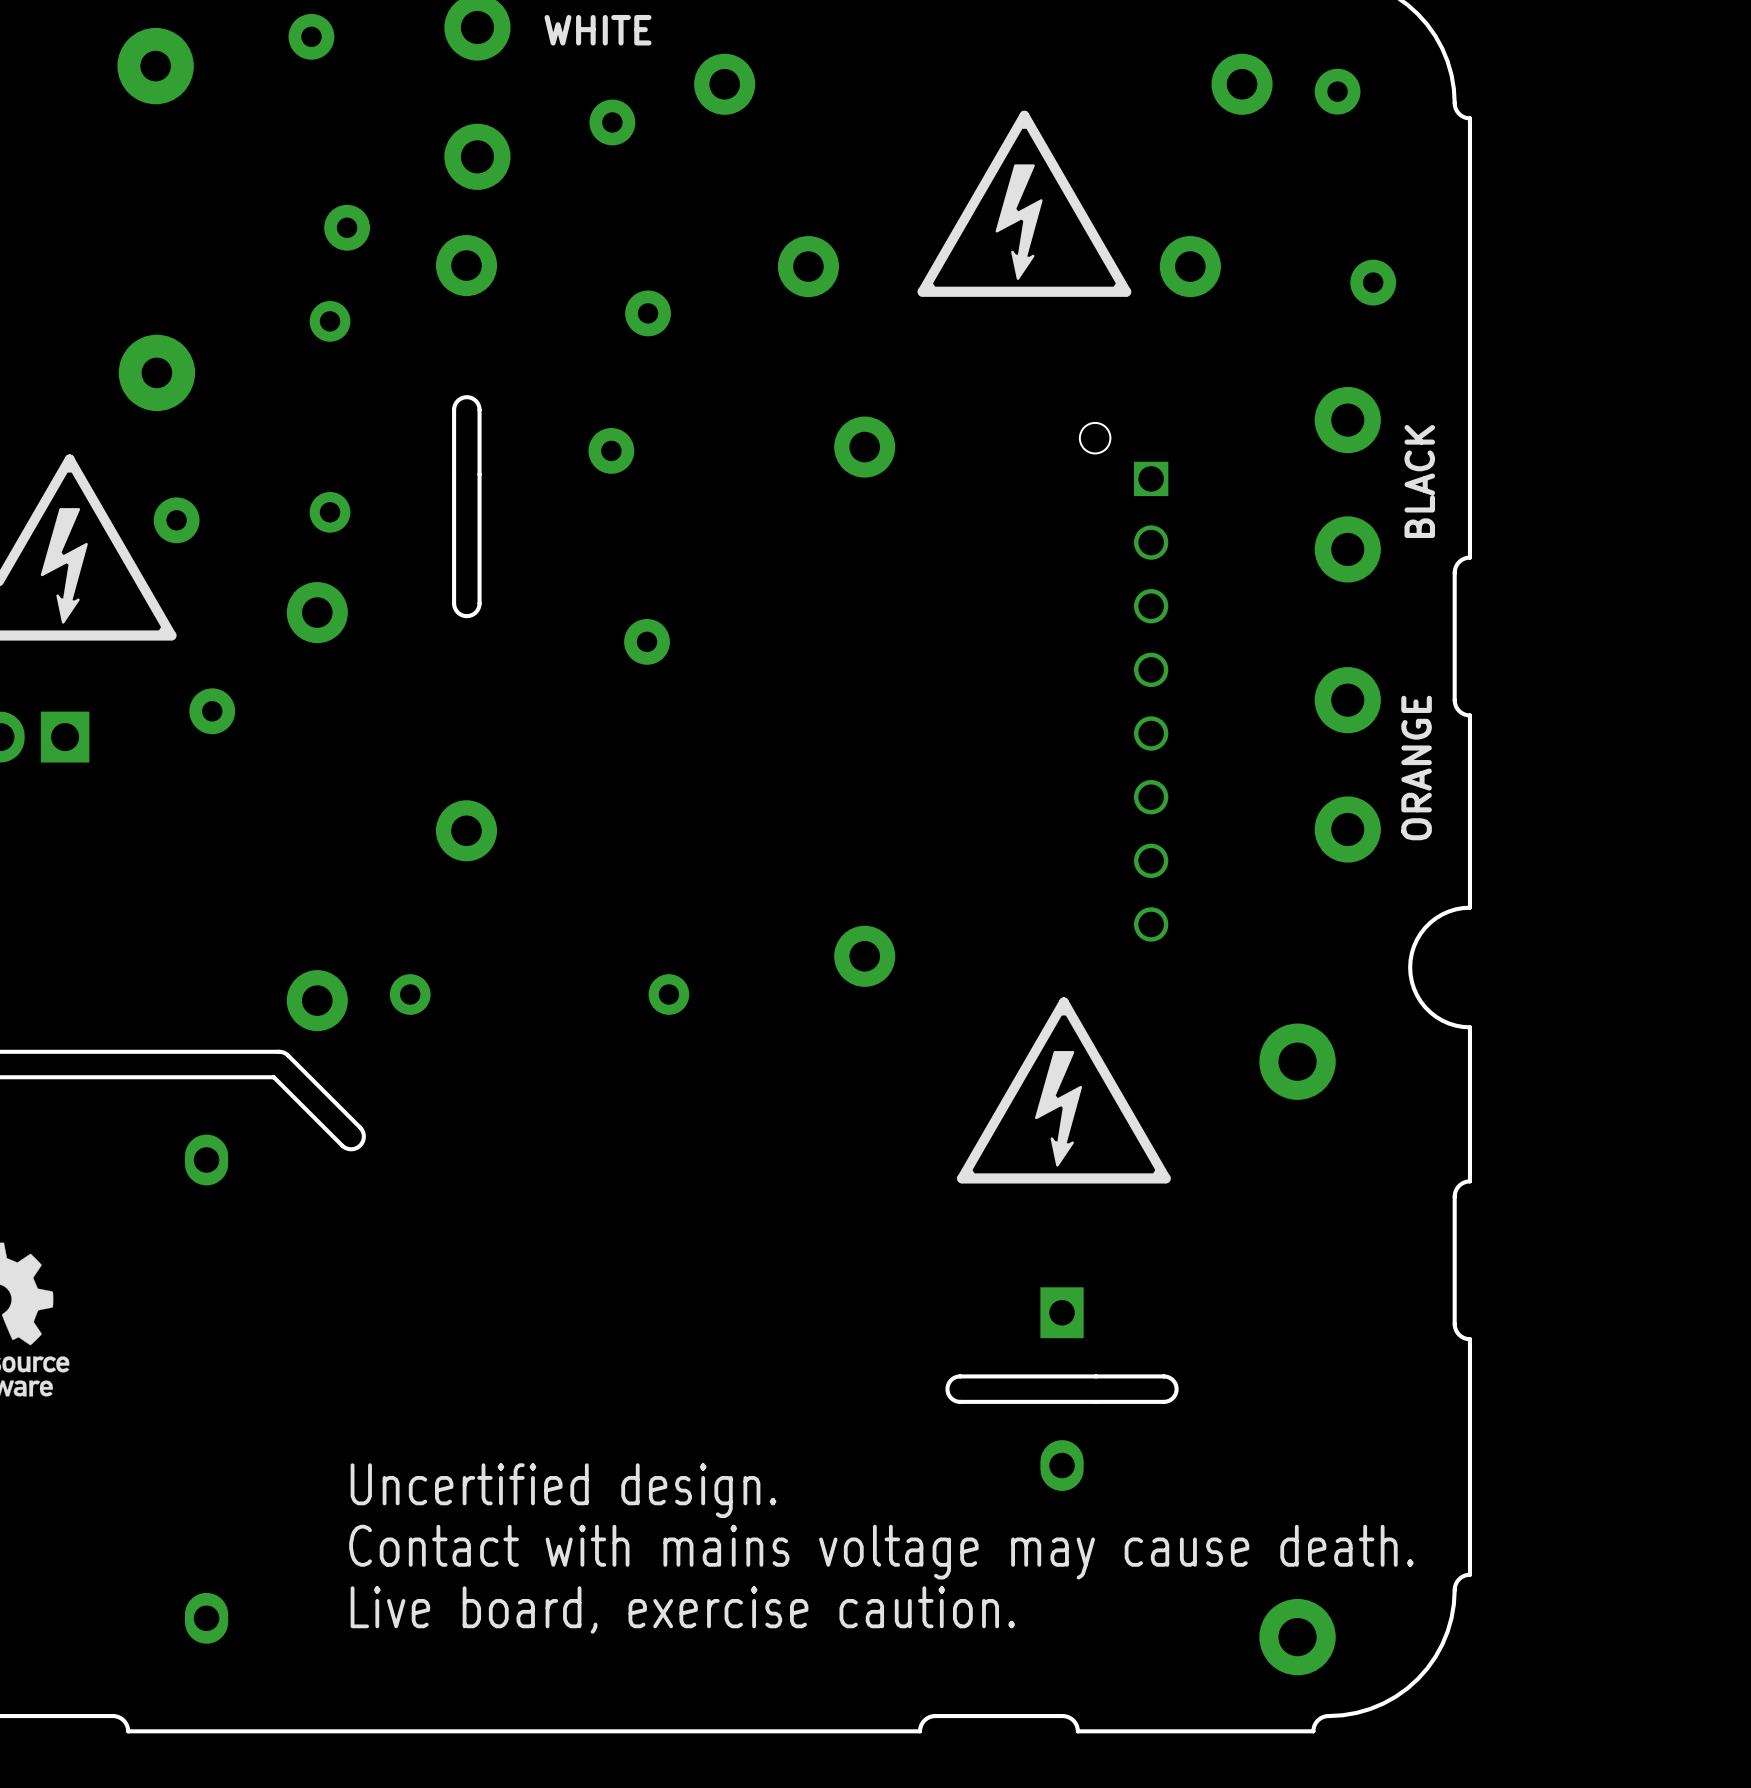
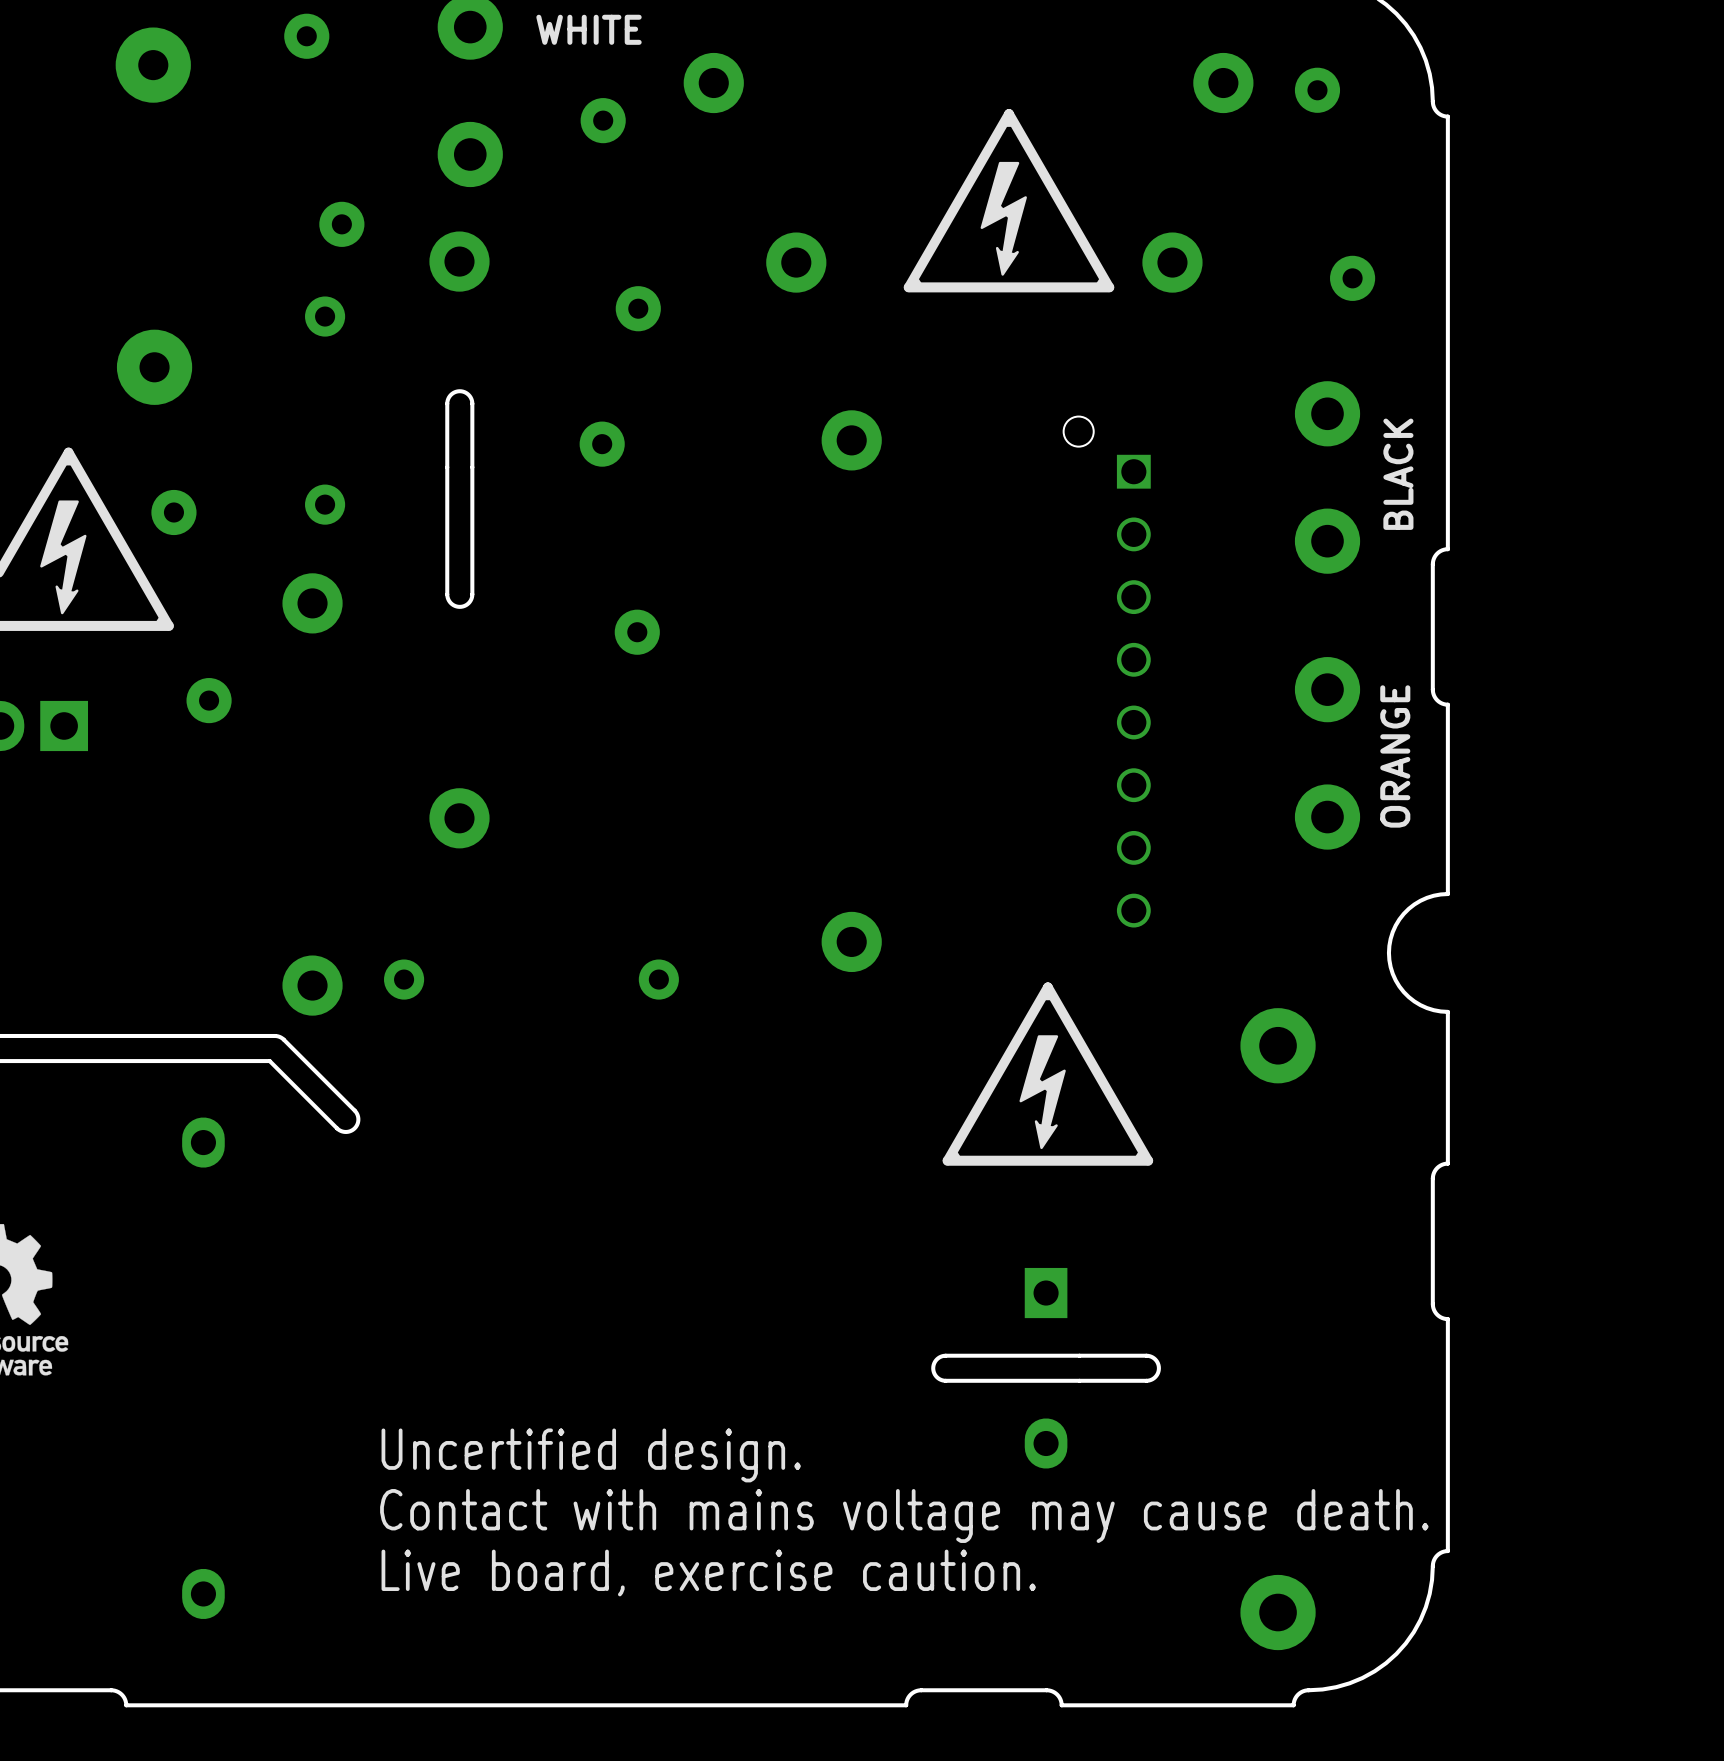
text position: Uncertified design. (563, 1490) -> Uncertified design. (591, 1455)
text position: Contact with mains voltage may cause death. (881, 1552) -> Contact with mains voltage may cause death. (904, 1516)
text position: Live board, exercise caution. (682, 1609) -> Live board, exercise caution. (708, 1572)

